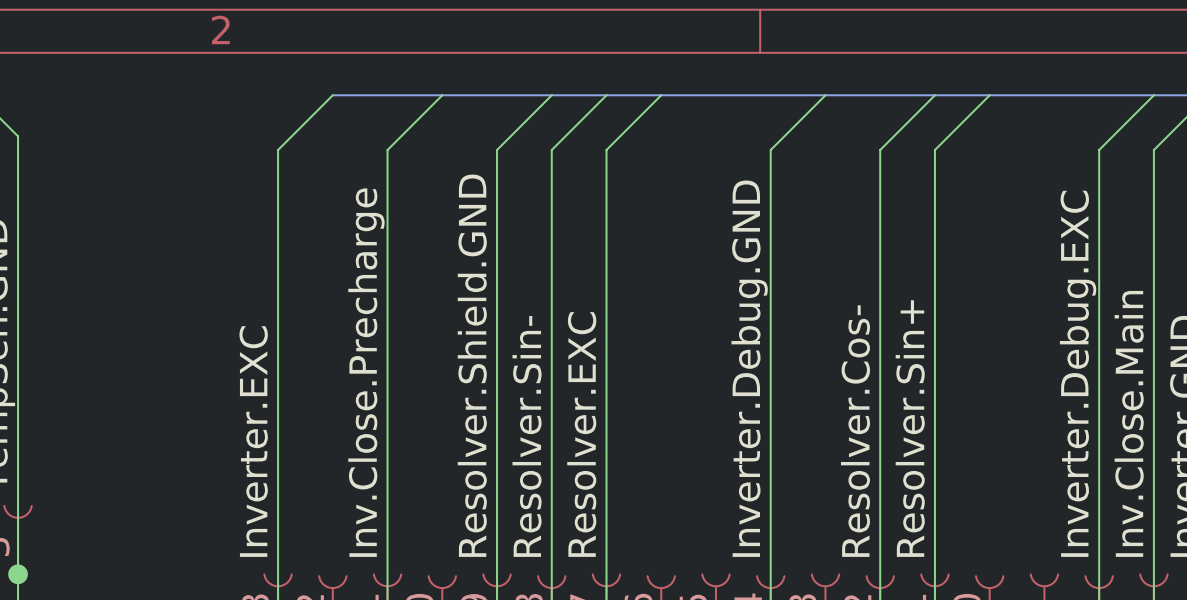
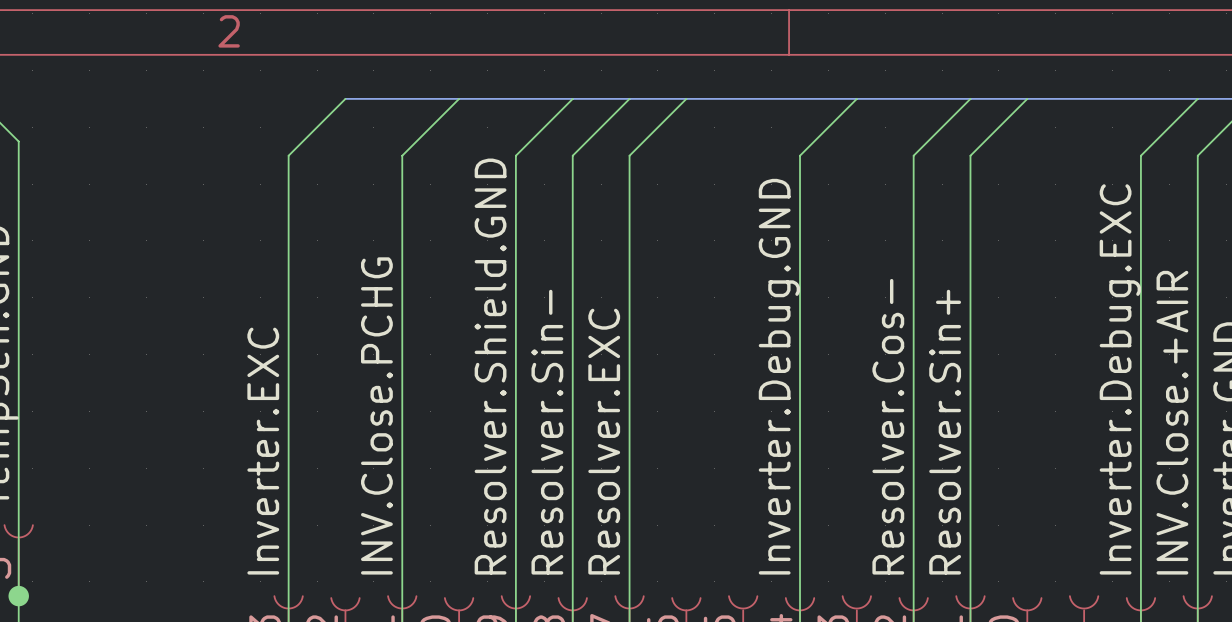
label: Inv.Close.Precharge (366, 372) -> INV.Close.PCHG (376, 415)
label: Inv.Close.Main (1129, 423) -> INV.Close.+AIR (1172, 422)

